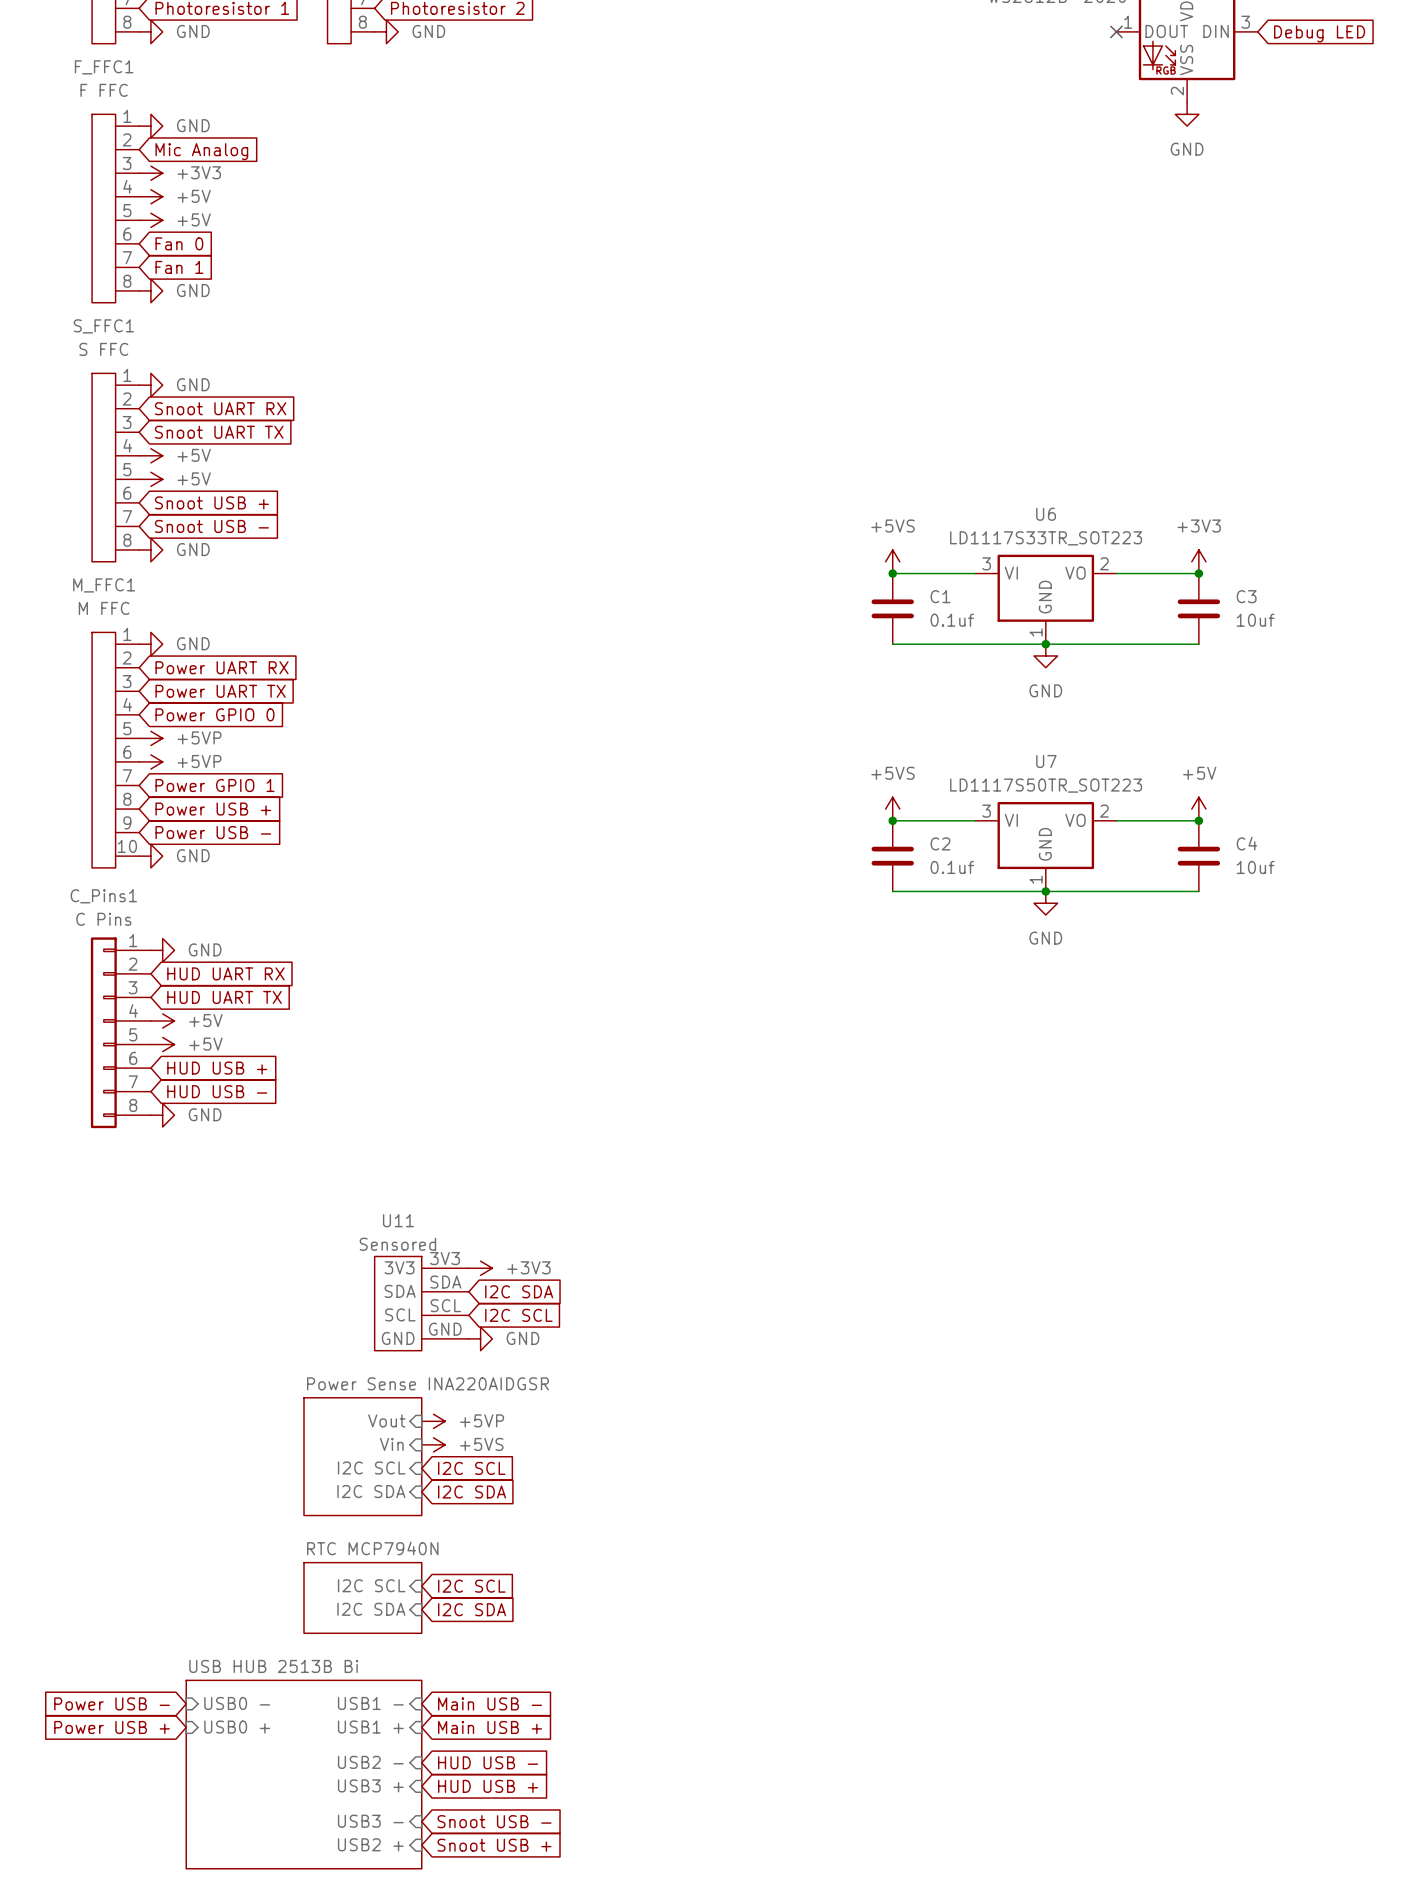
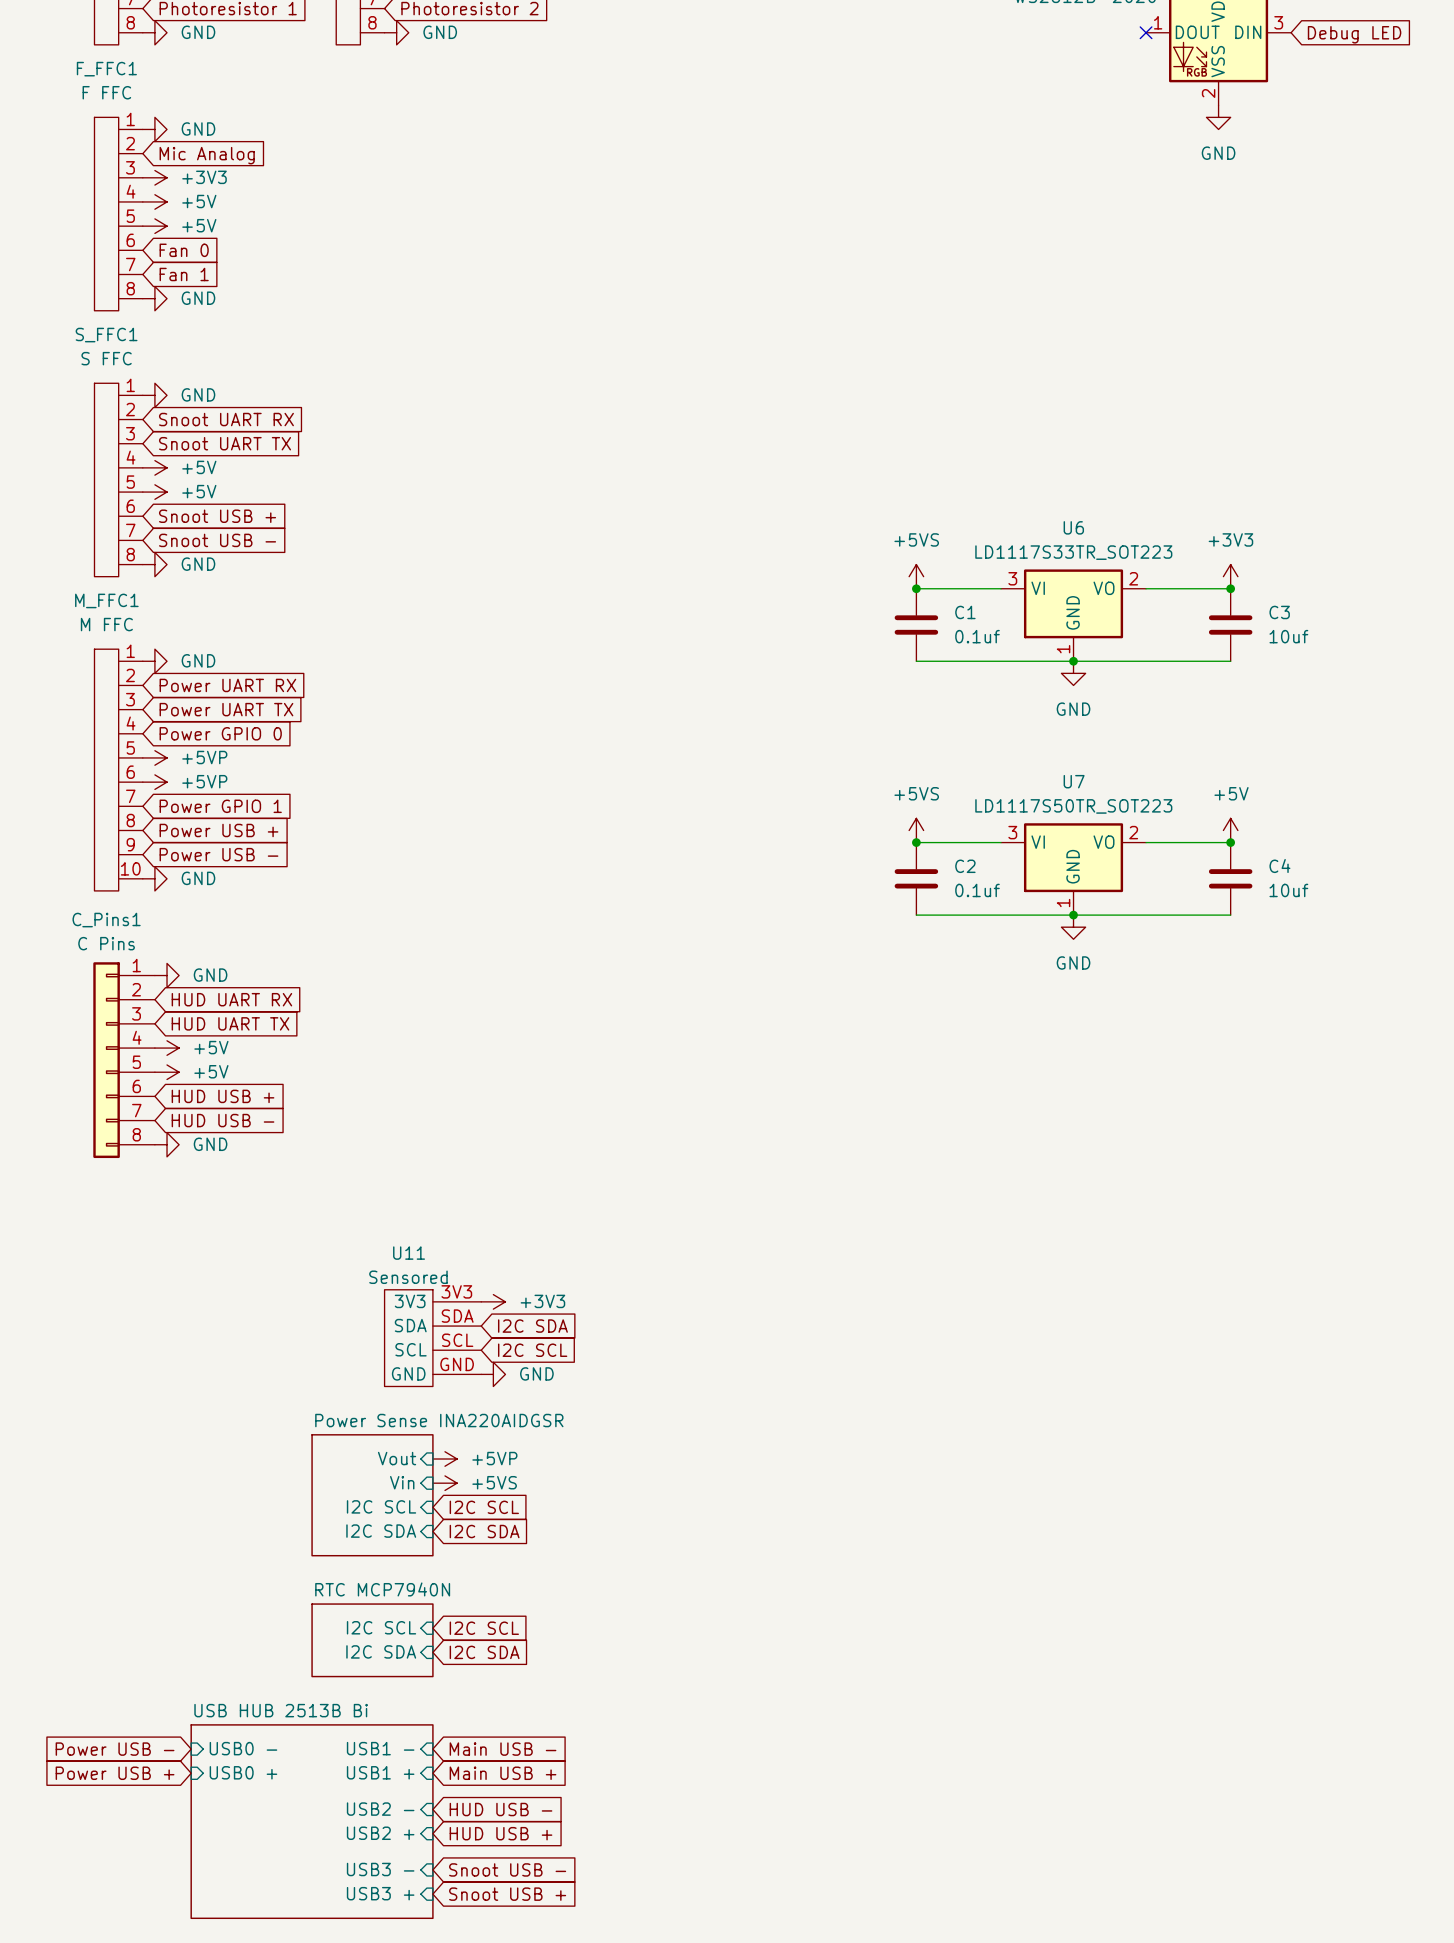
sheet pin: USB3 + (370, 1785) -> USB2 + (380, 1833)
sheet pin: USB2 + (370, 1844) -> USB3 + (380, 1893)

